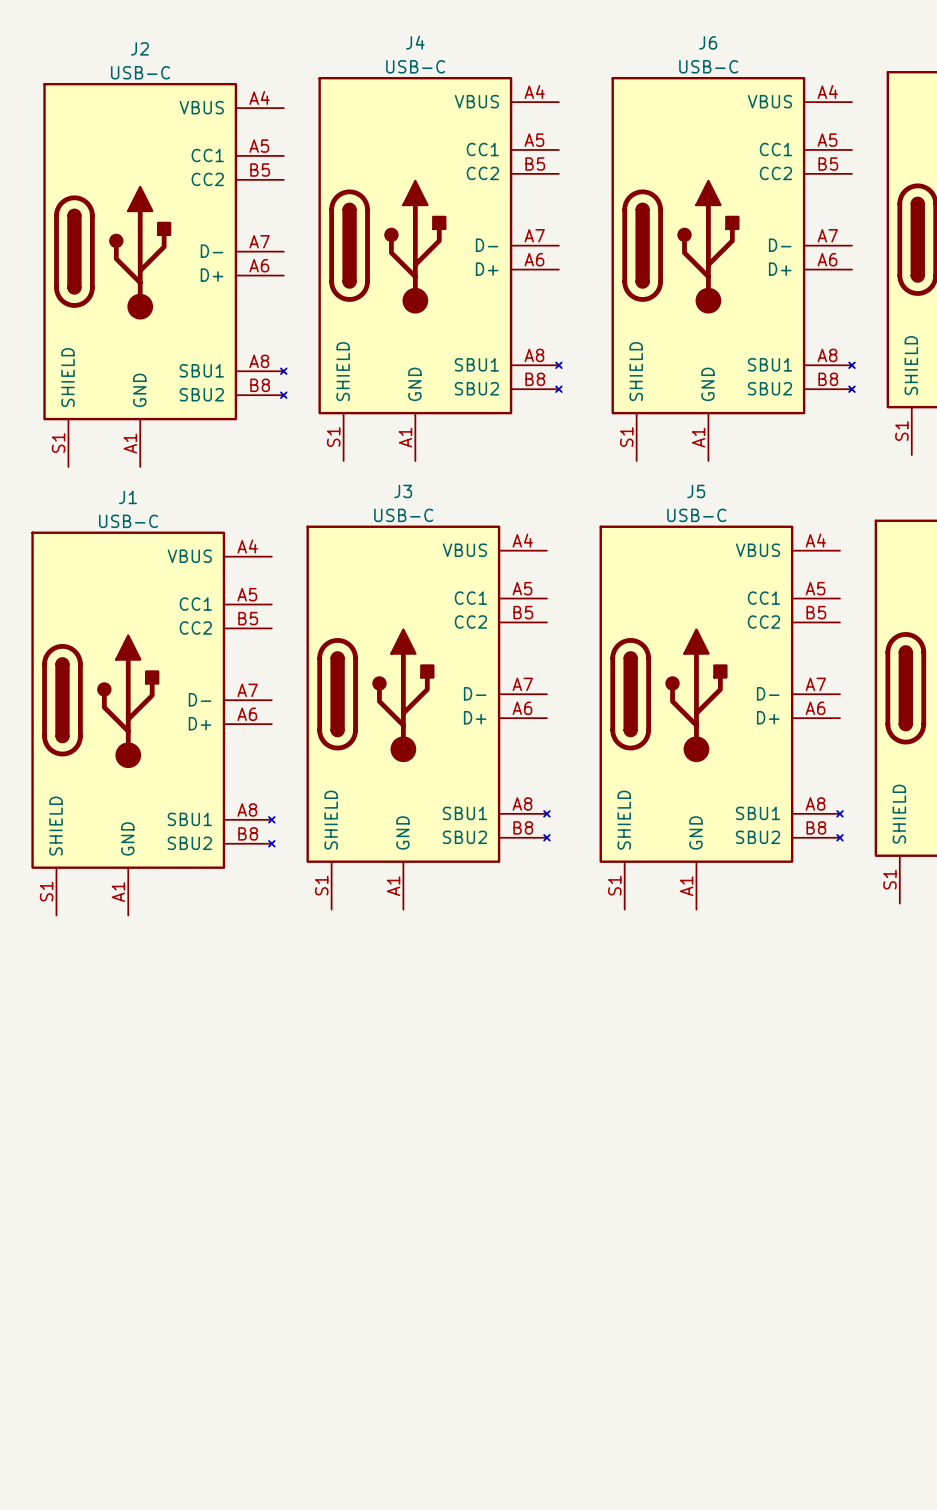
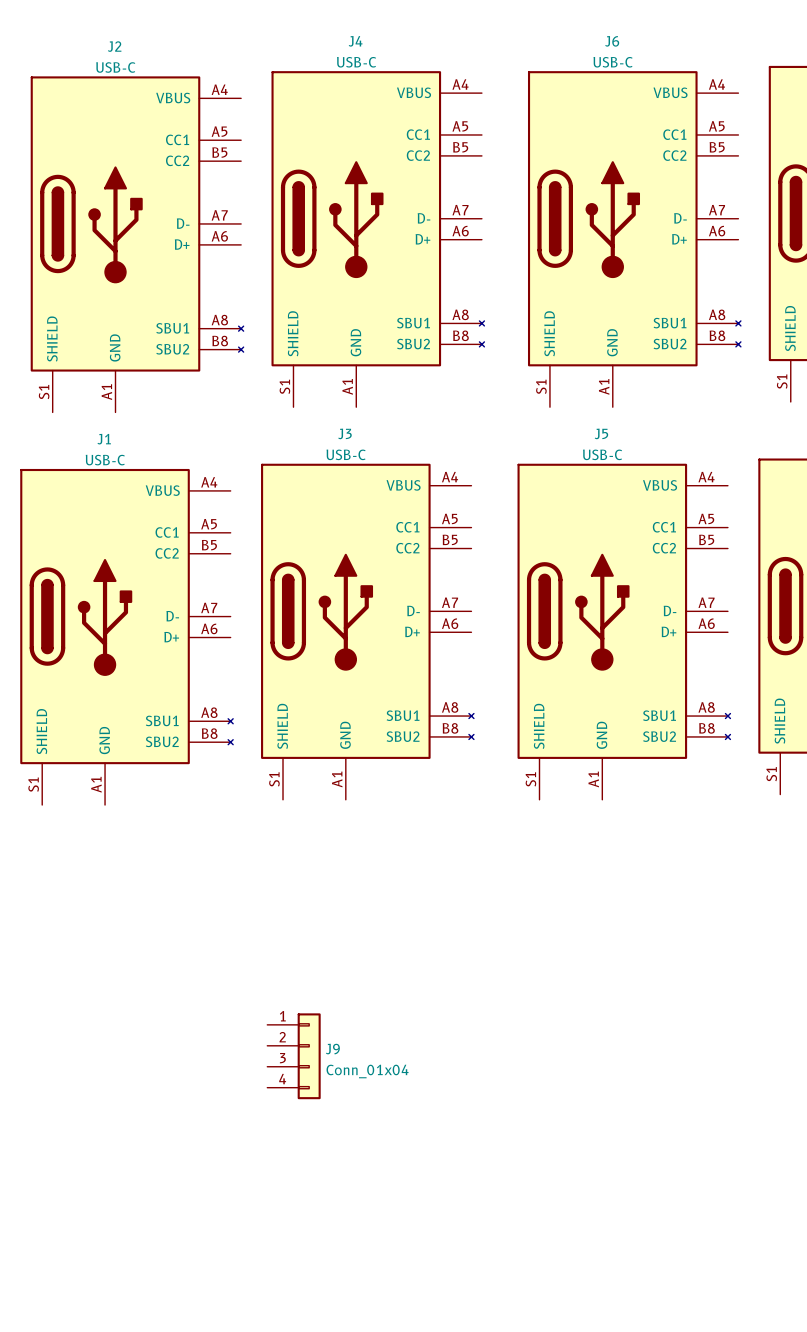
J9: none -> Conn_01x04 (293, 1056)

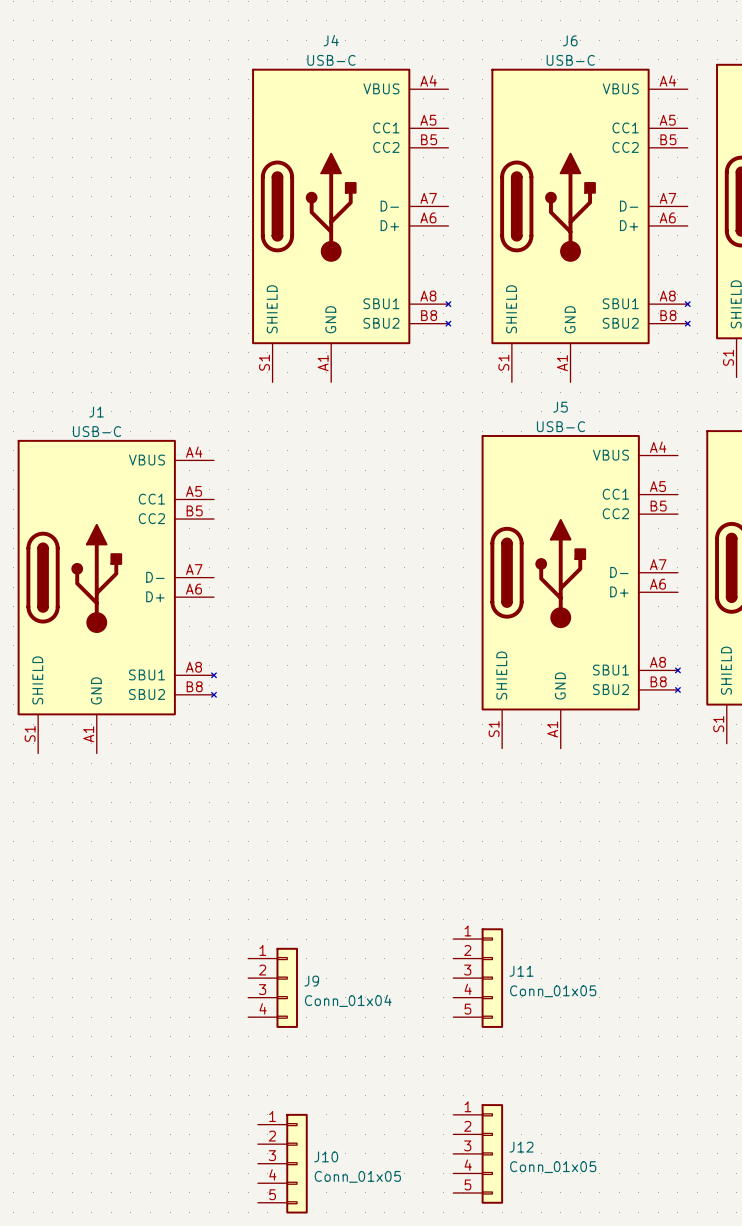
J2: USB-C (137, 244) -> none
J3: USB-C (367, 631) -> none
J11: none -> Conn_01x05 (478, 978)
J12: none -> Conn_01x05 (478, 1153)
J10: none -> Conn_01x05 (282, 1163)

